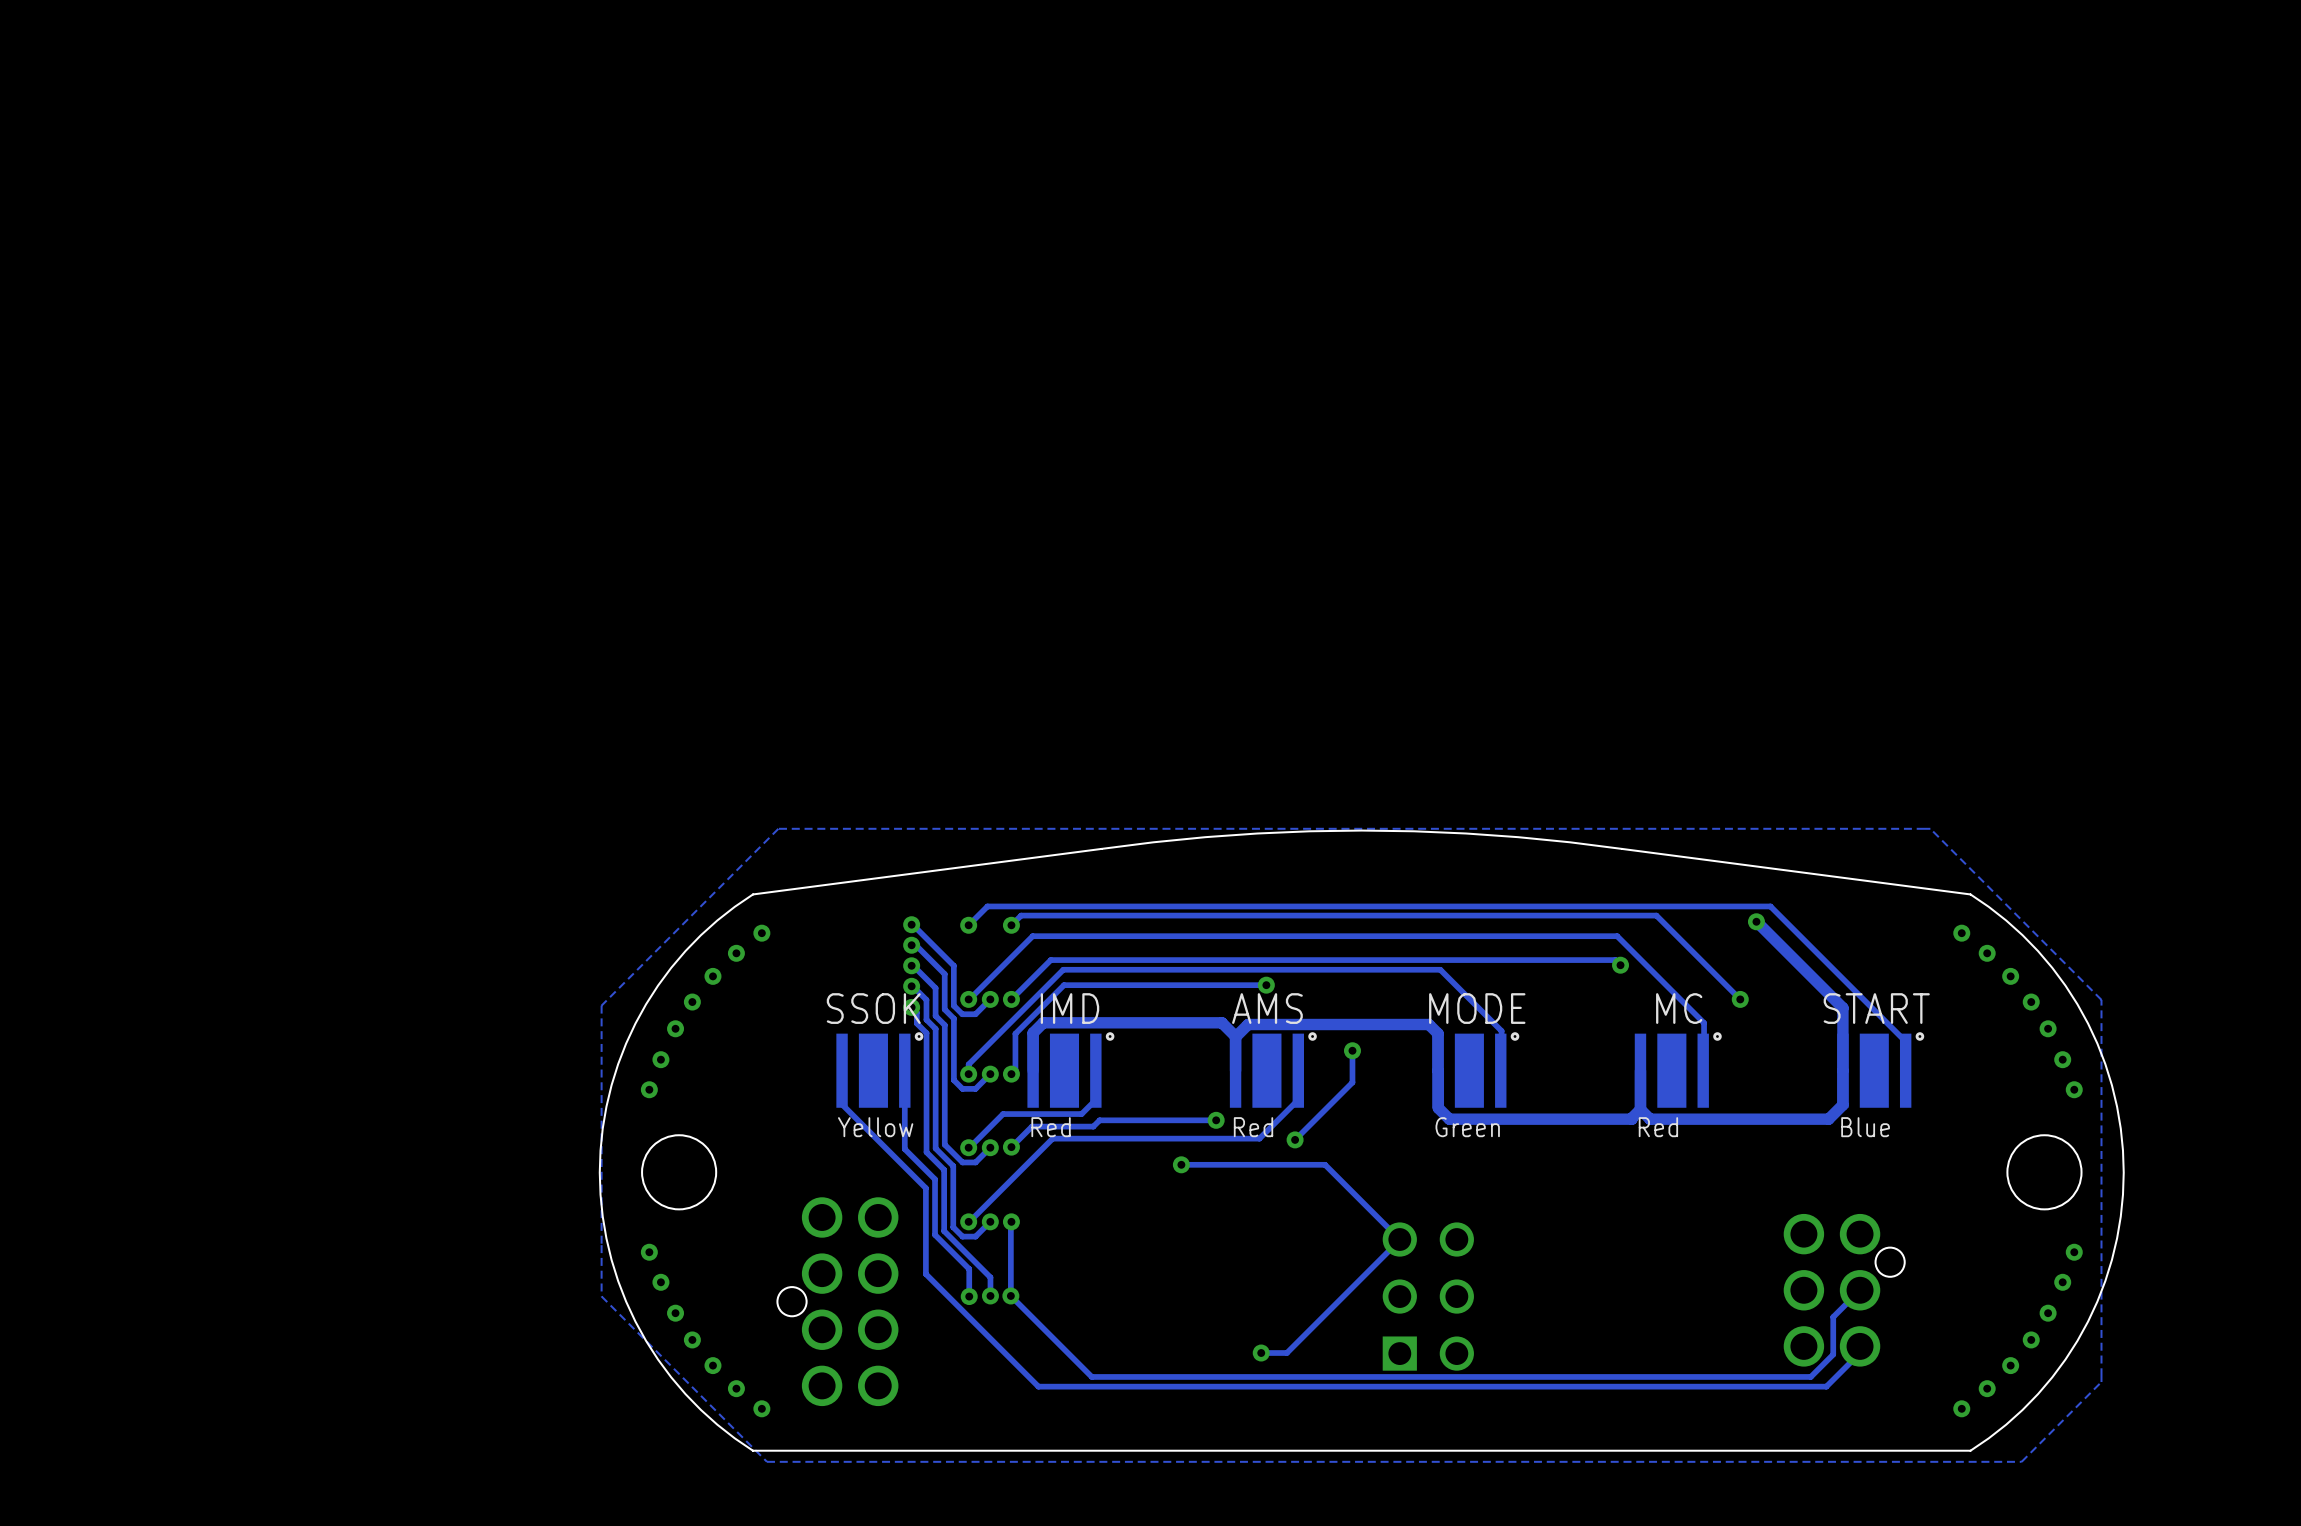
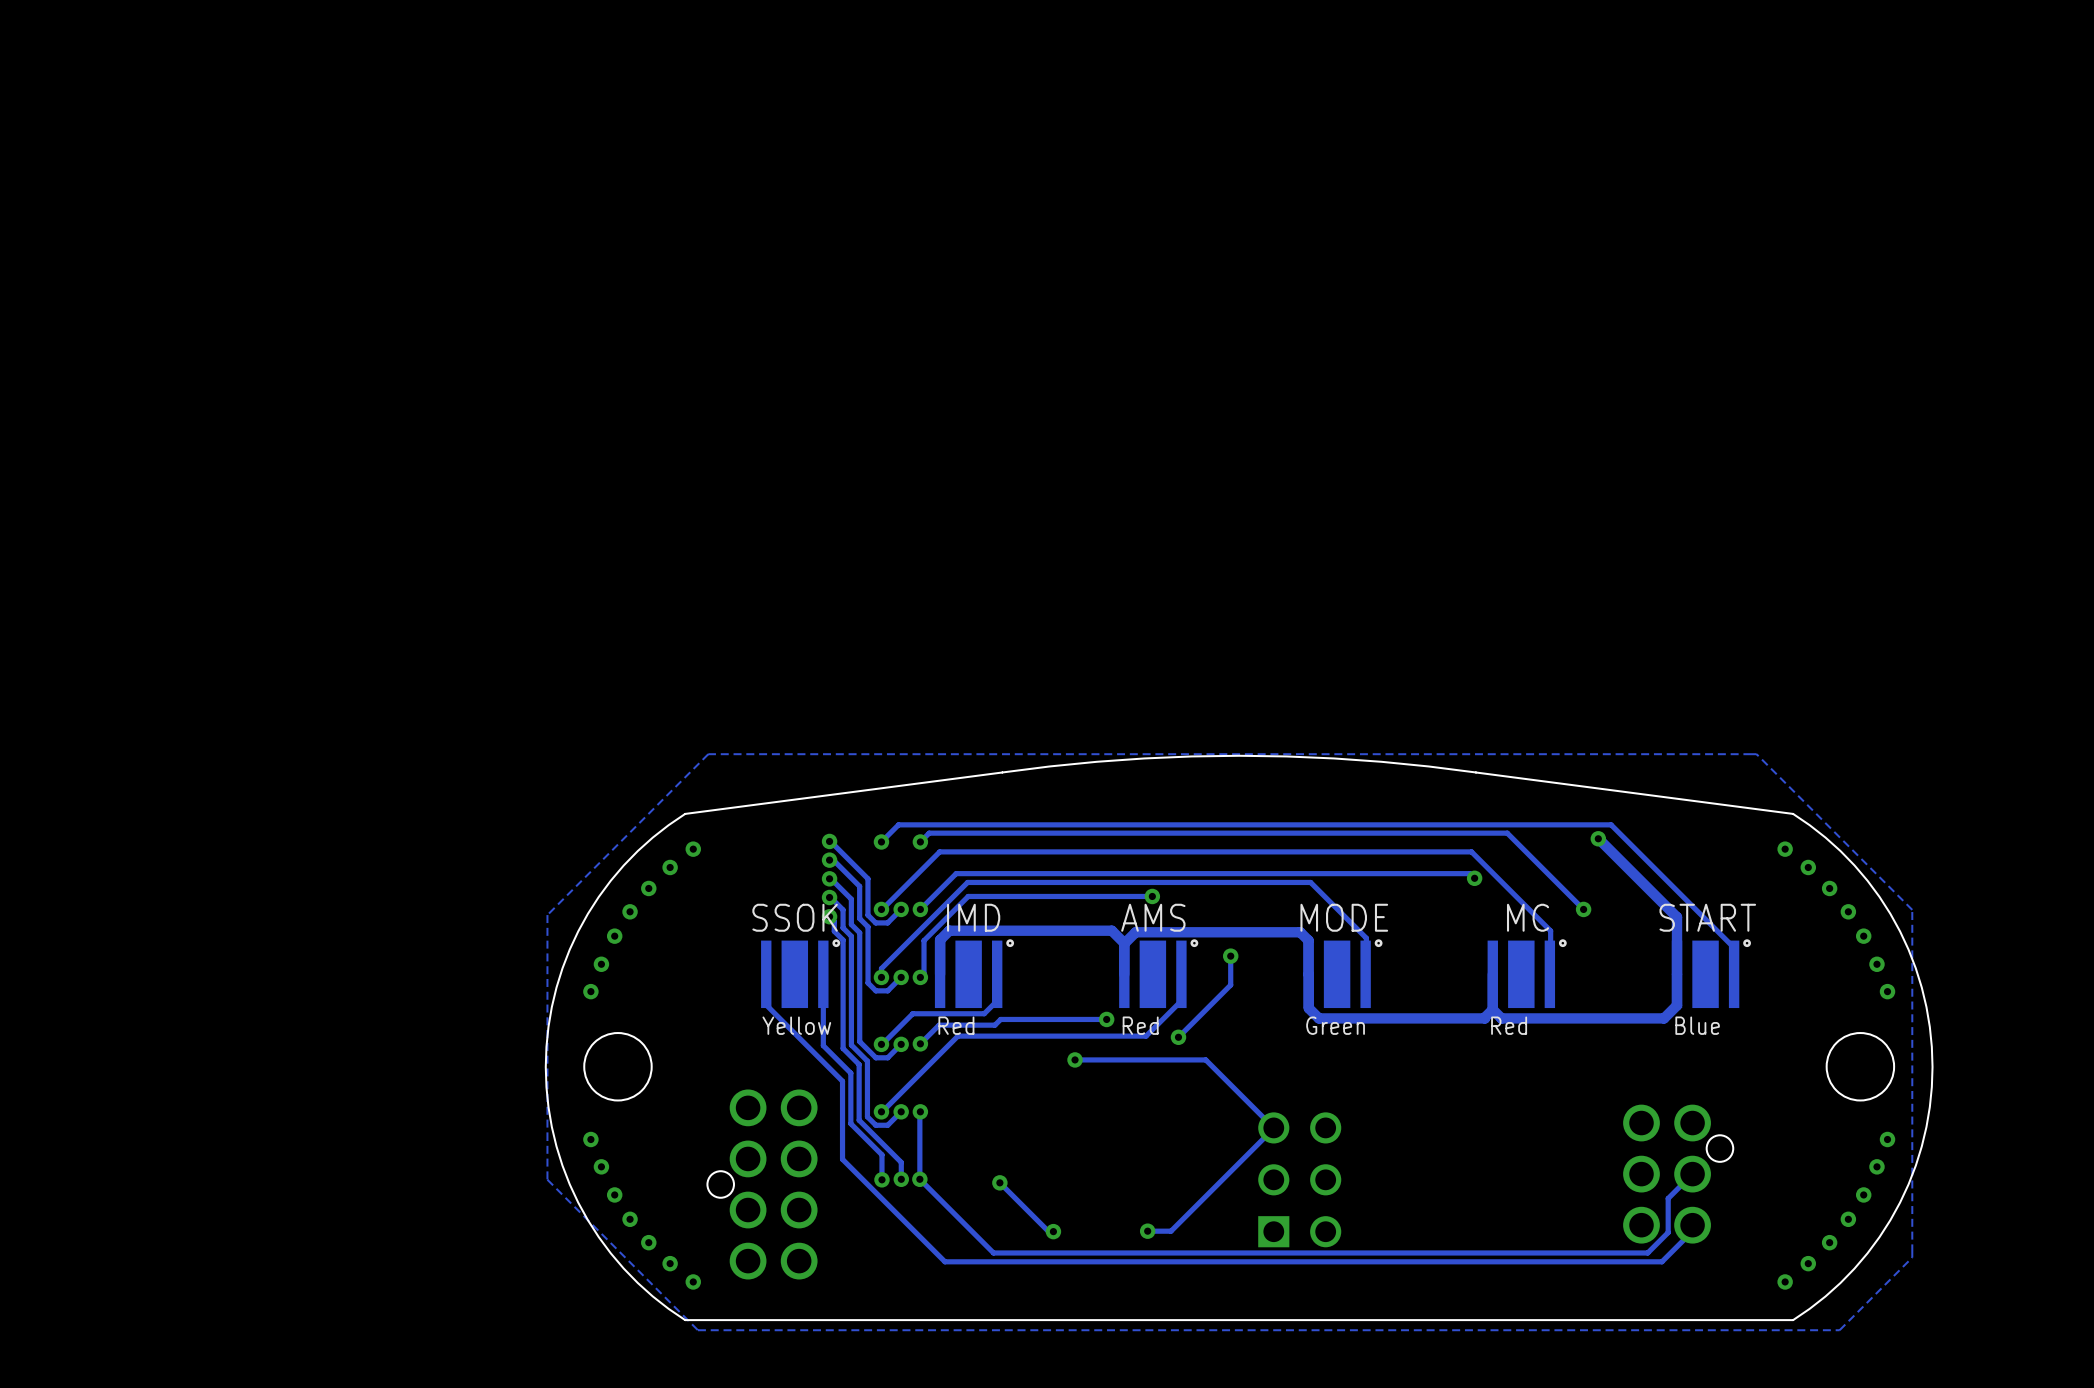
track: none -> (999, 1182) (1048, 1231) (1053, 1231)
via: none -> (999, 1182)
via: none -> (1053, 1231)

